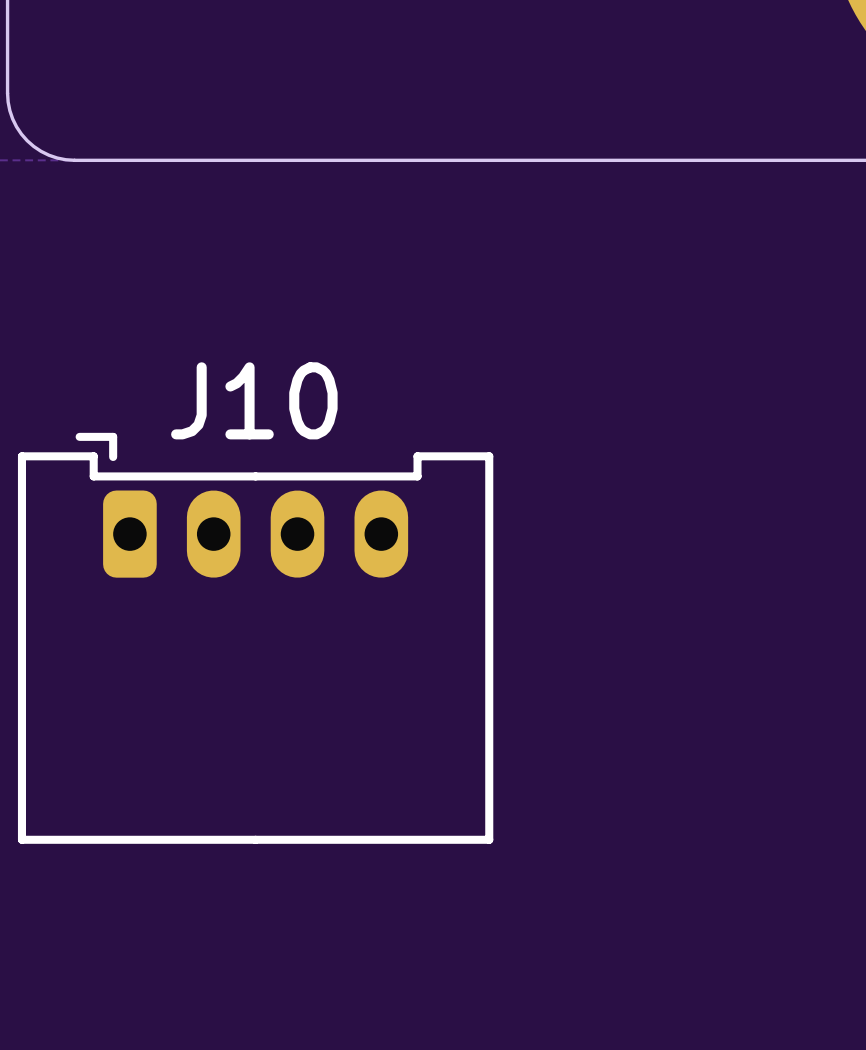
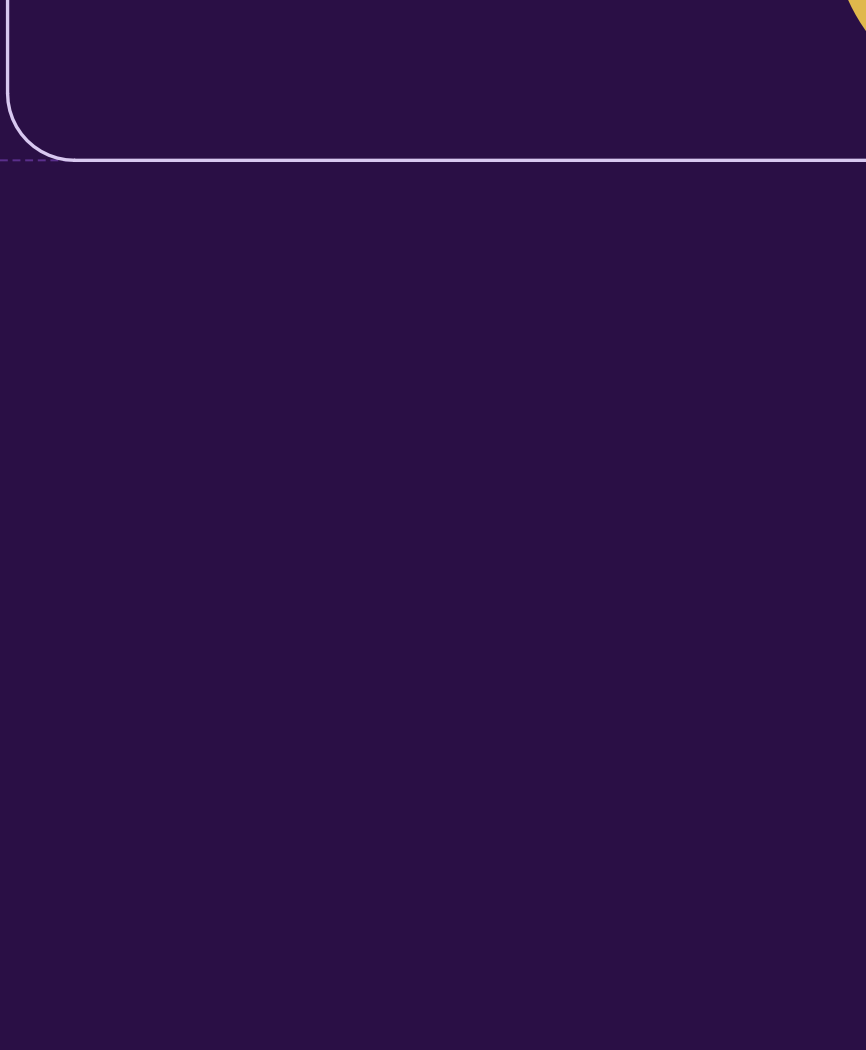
J10: (255, 638) -> none

